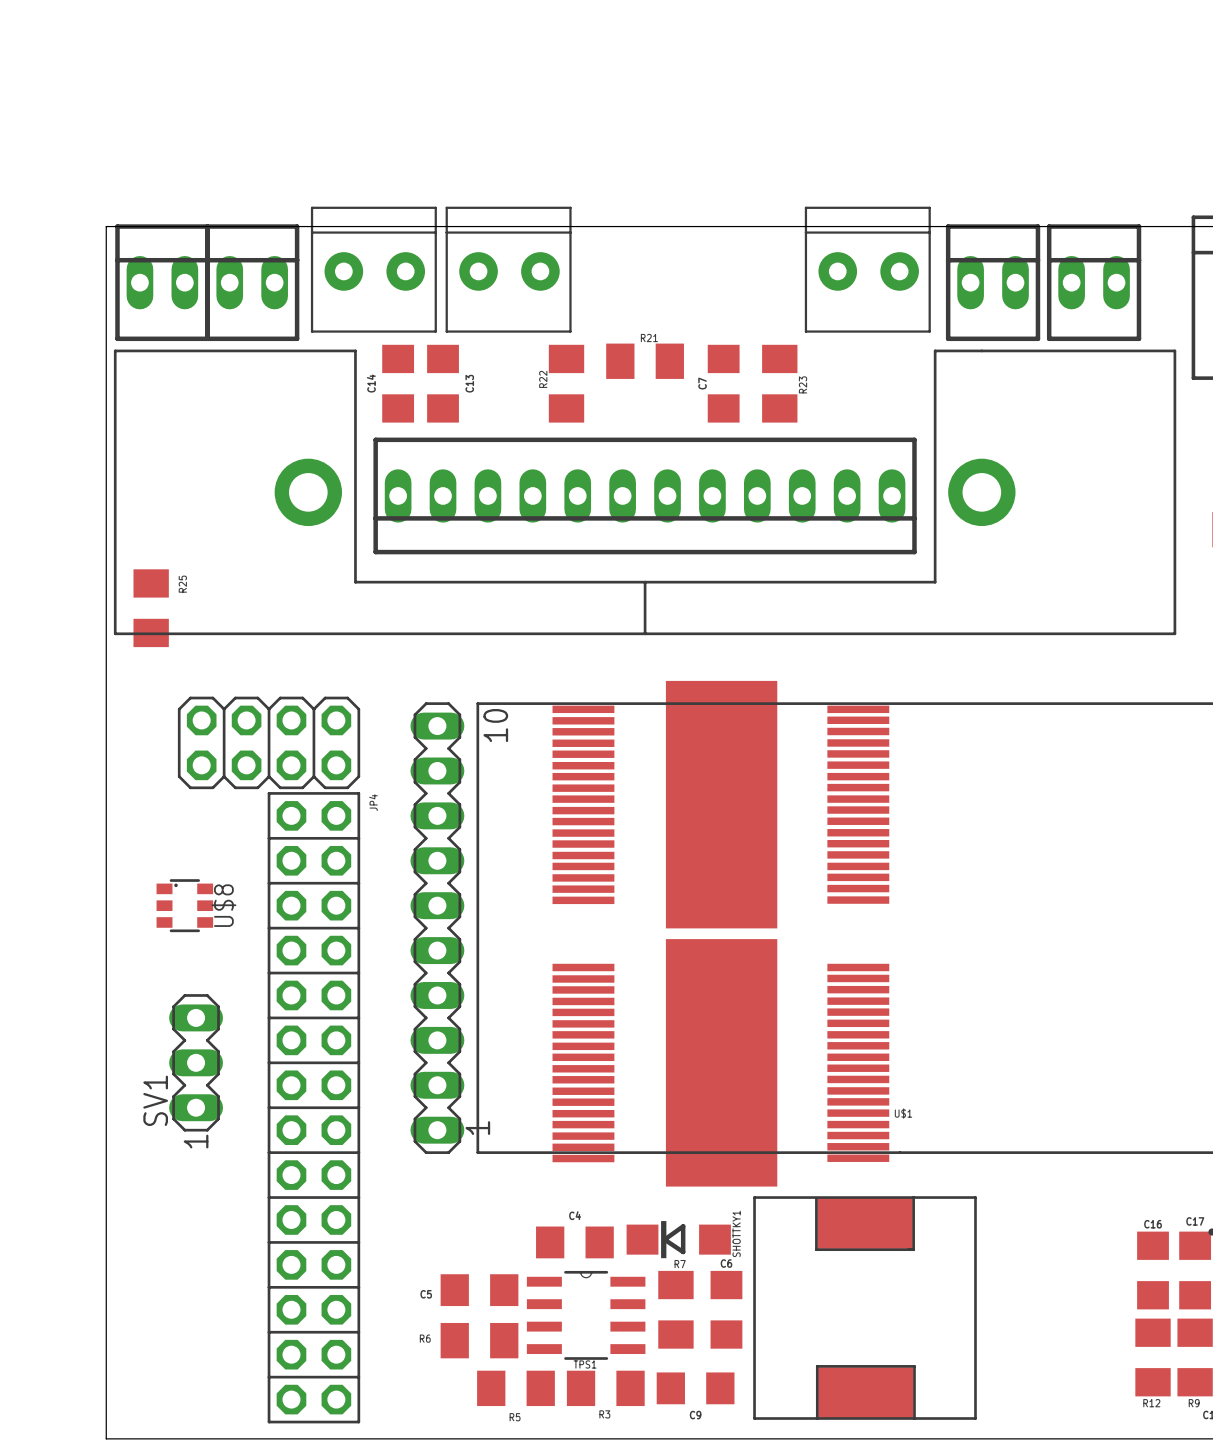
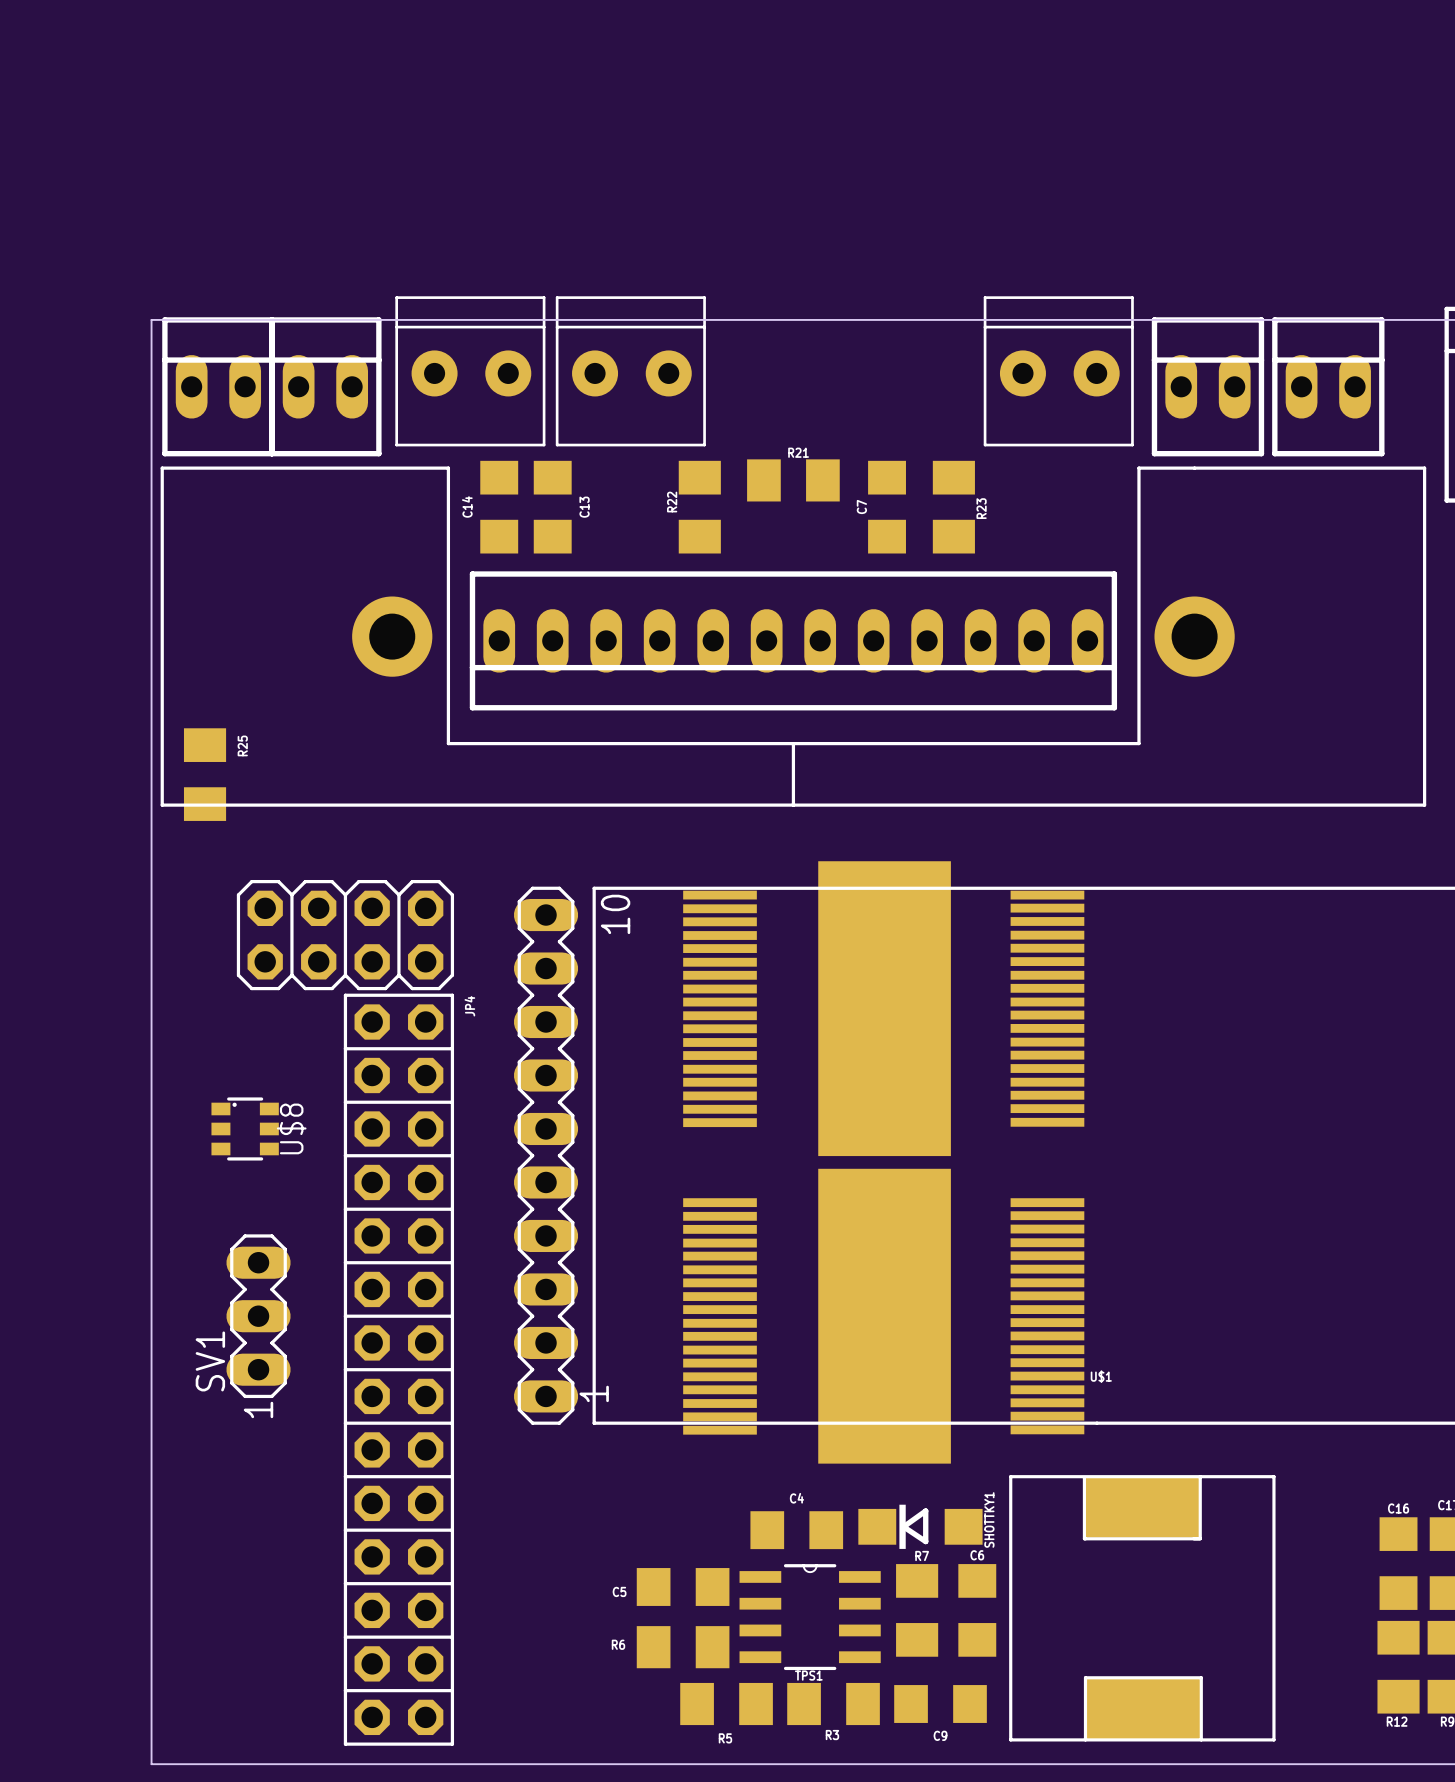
SHOTTKY1 position: (678, 1239) -> (920, 1526)
C4 position: (574, 1242) -> (796, 1530)
C5 position: (479, 1290) -> (683, 1586)
part position: (865, 1308) -> (1142, 1608)
R7 position: (675, 1309) -> (917, 1610)
C6 position: (726, 1309) -> (977, 1610)
TPS1 position: (586, 1315) -> (810, 1617)
R6 position: (479, 1340) -> (683, 1647)
R5 position: (515, 1388) -> (726, 1704)
R3 position: (605, 1388) -> (833, 1704)
C9 position: (695, 1388) -> (940, 1704)

